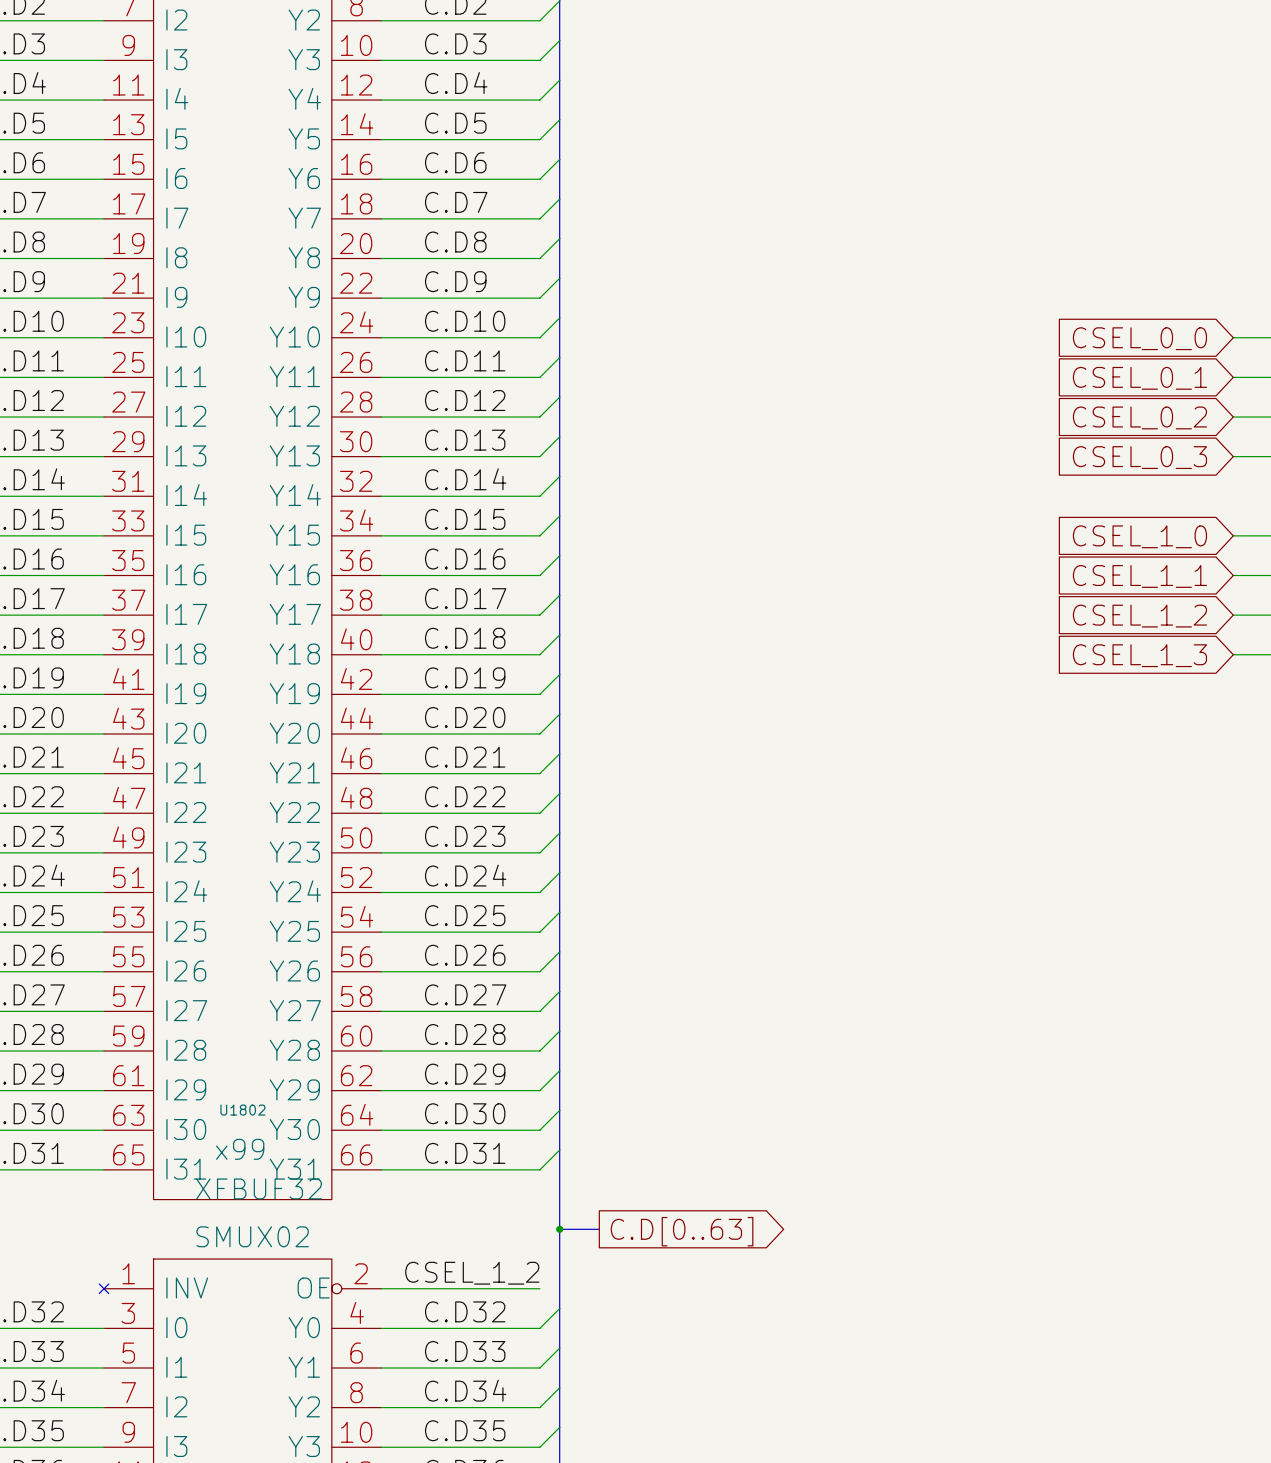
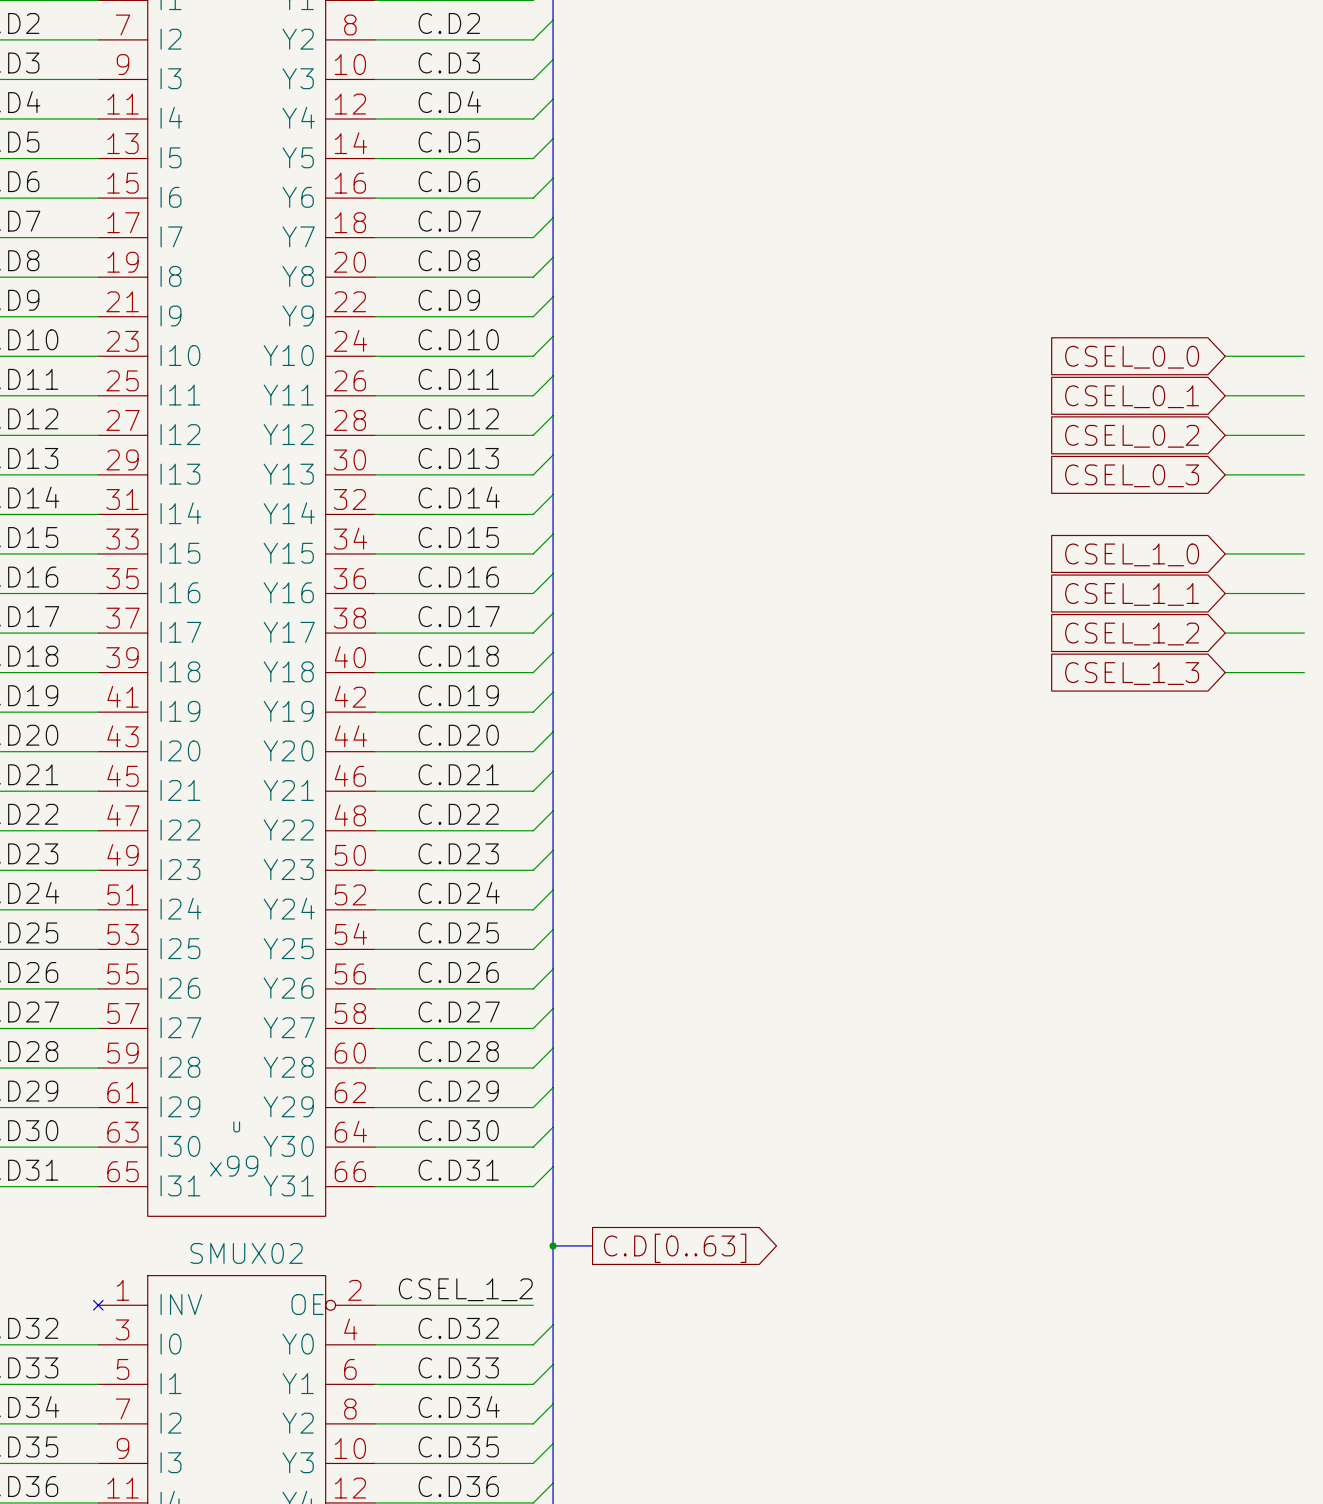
U1802 name: U1802 (242, 1110) -> U (236, 1126)
U1802 value: XFBUF32 (259, 1188) -> none

